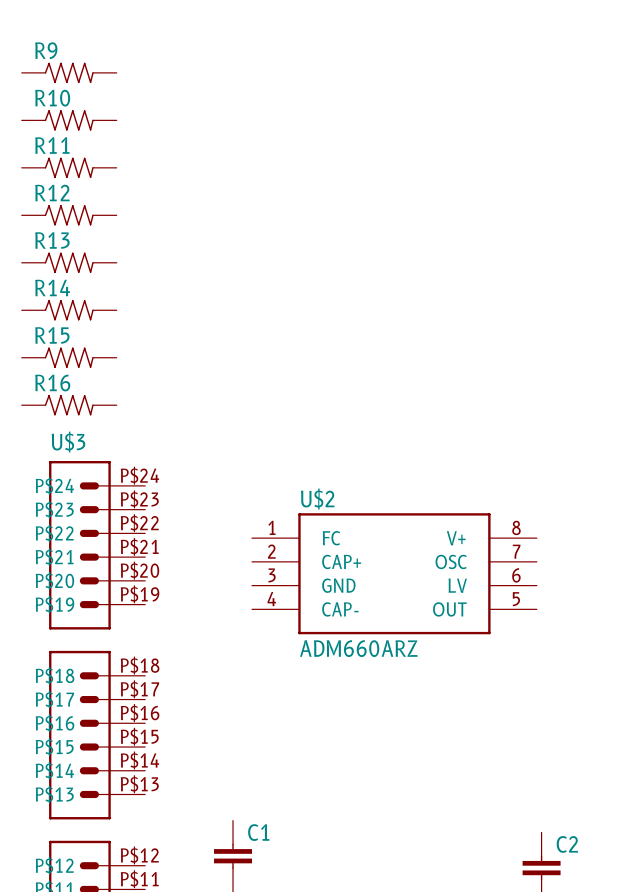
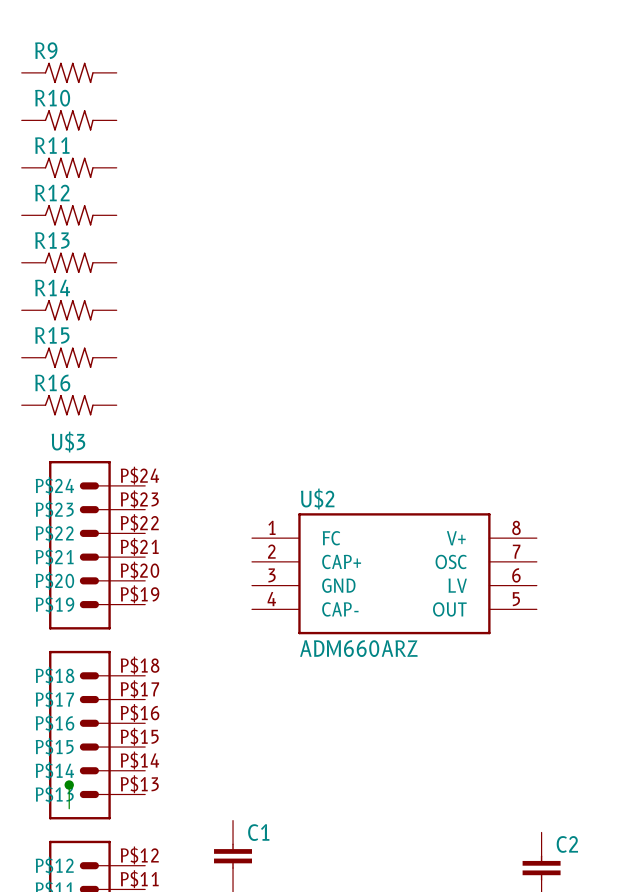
wire: none -> (69, 784) (69, 808)
junction: none -> (69, 784)

